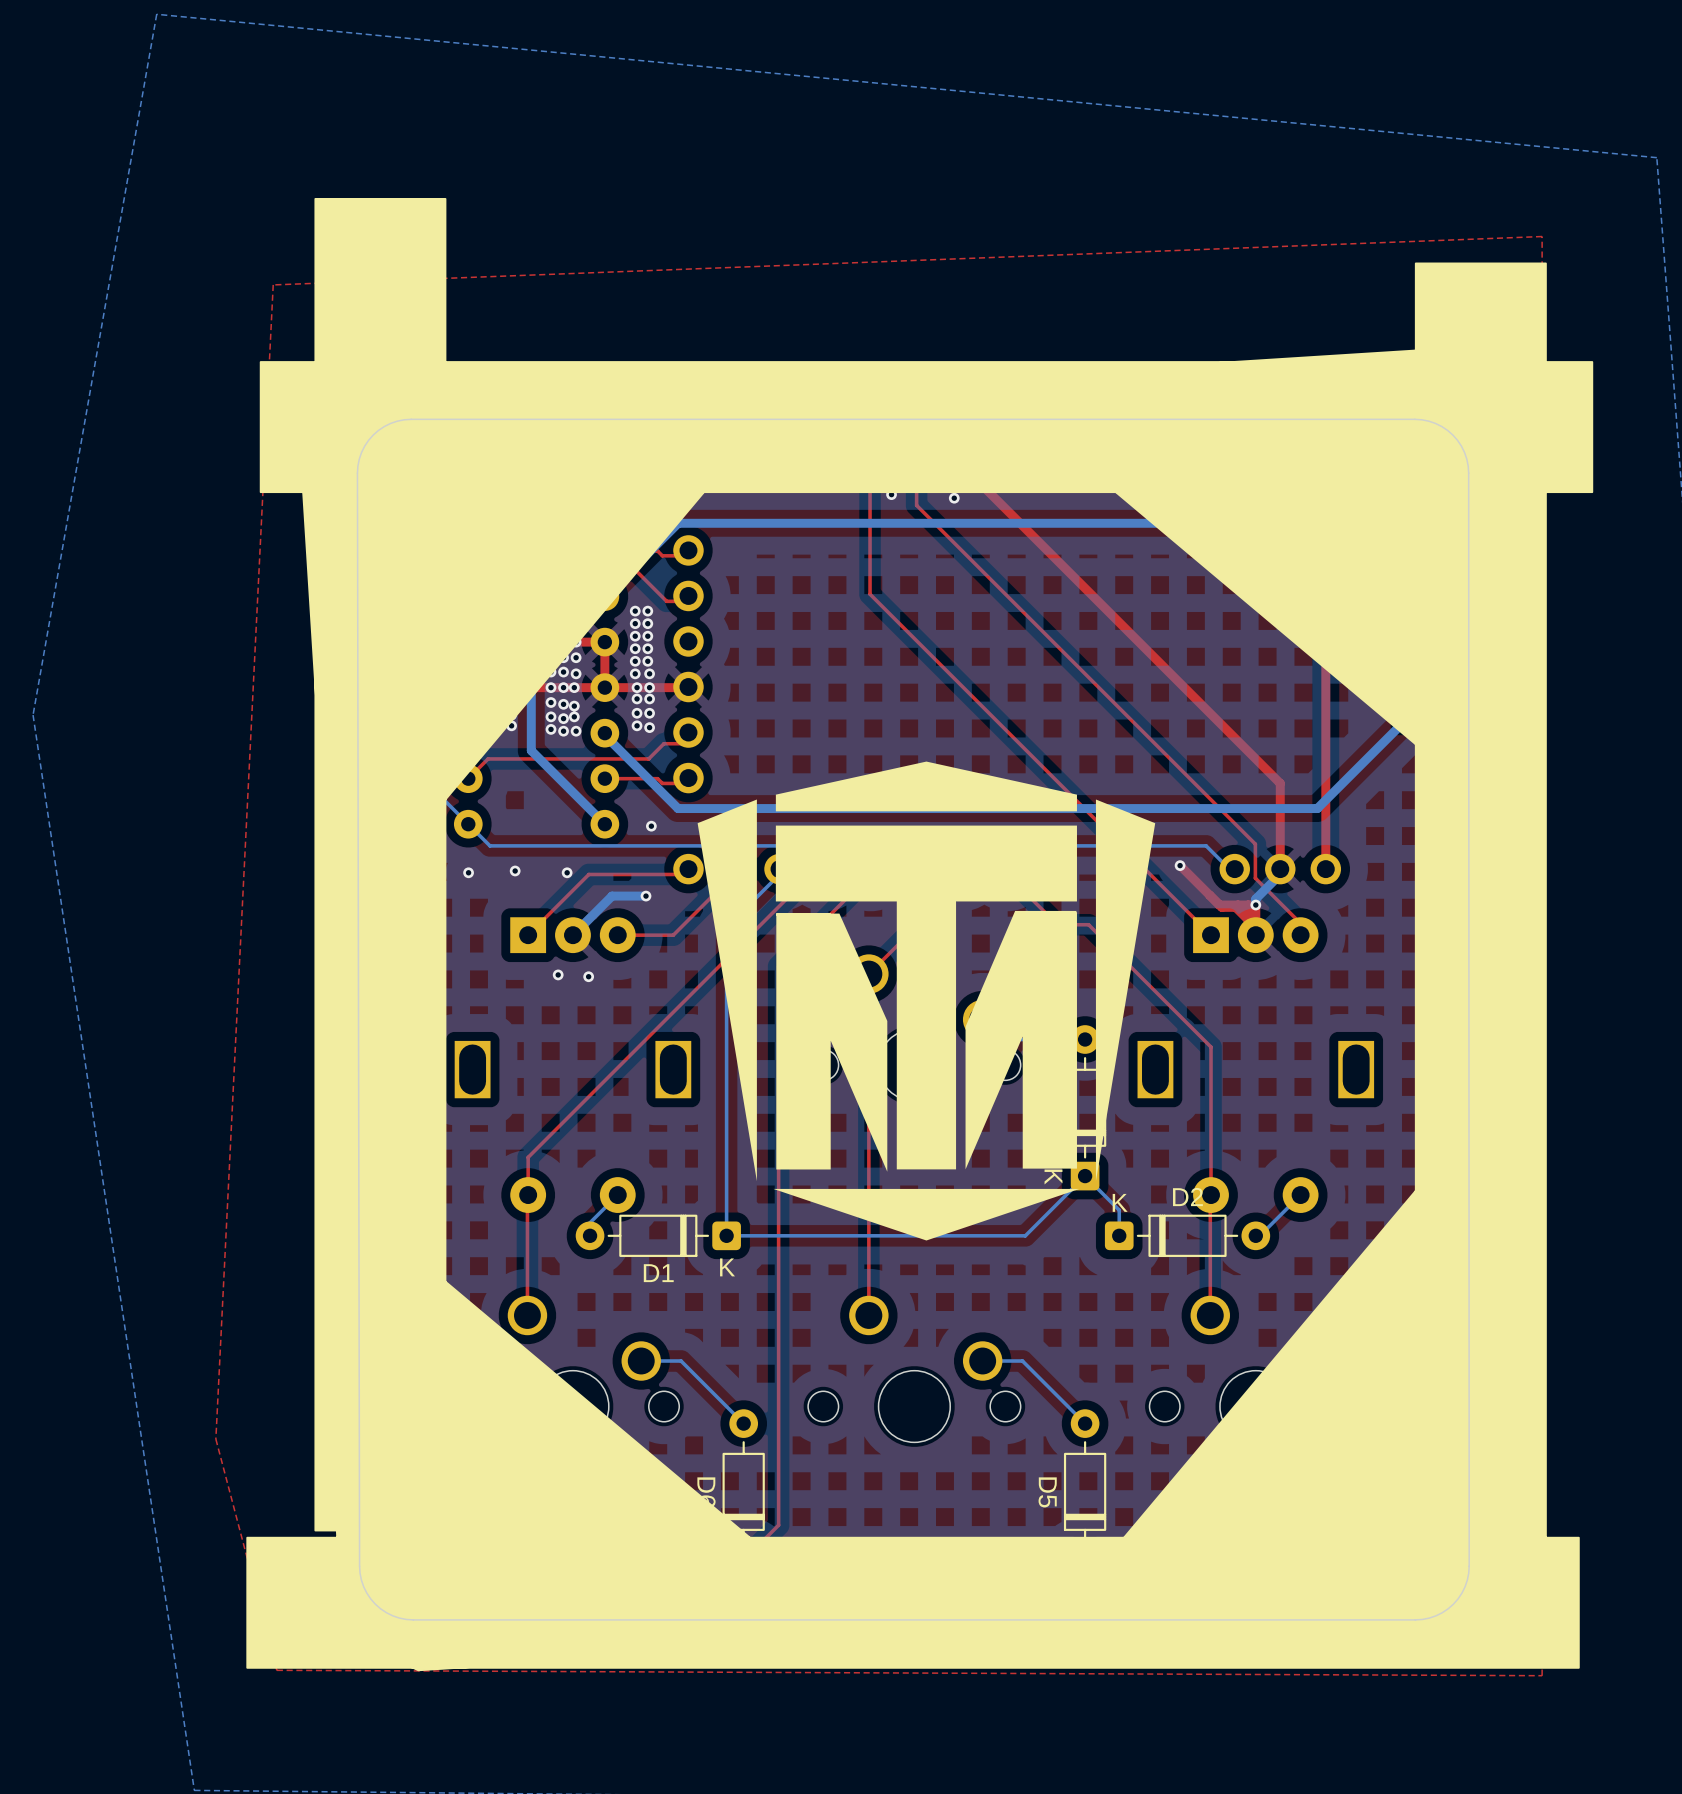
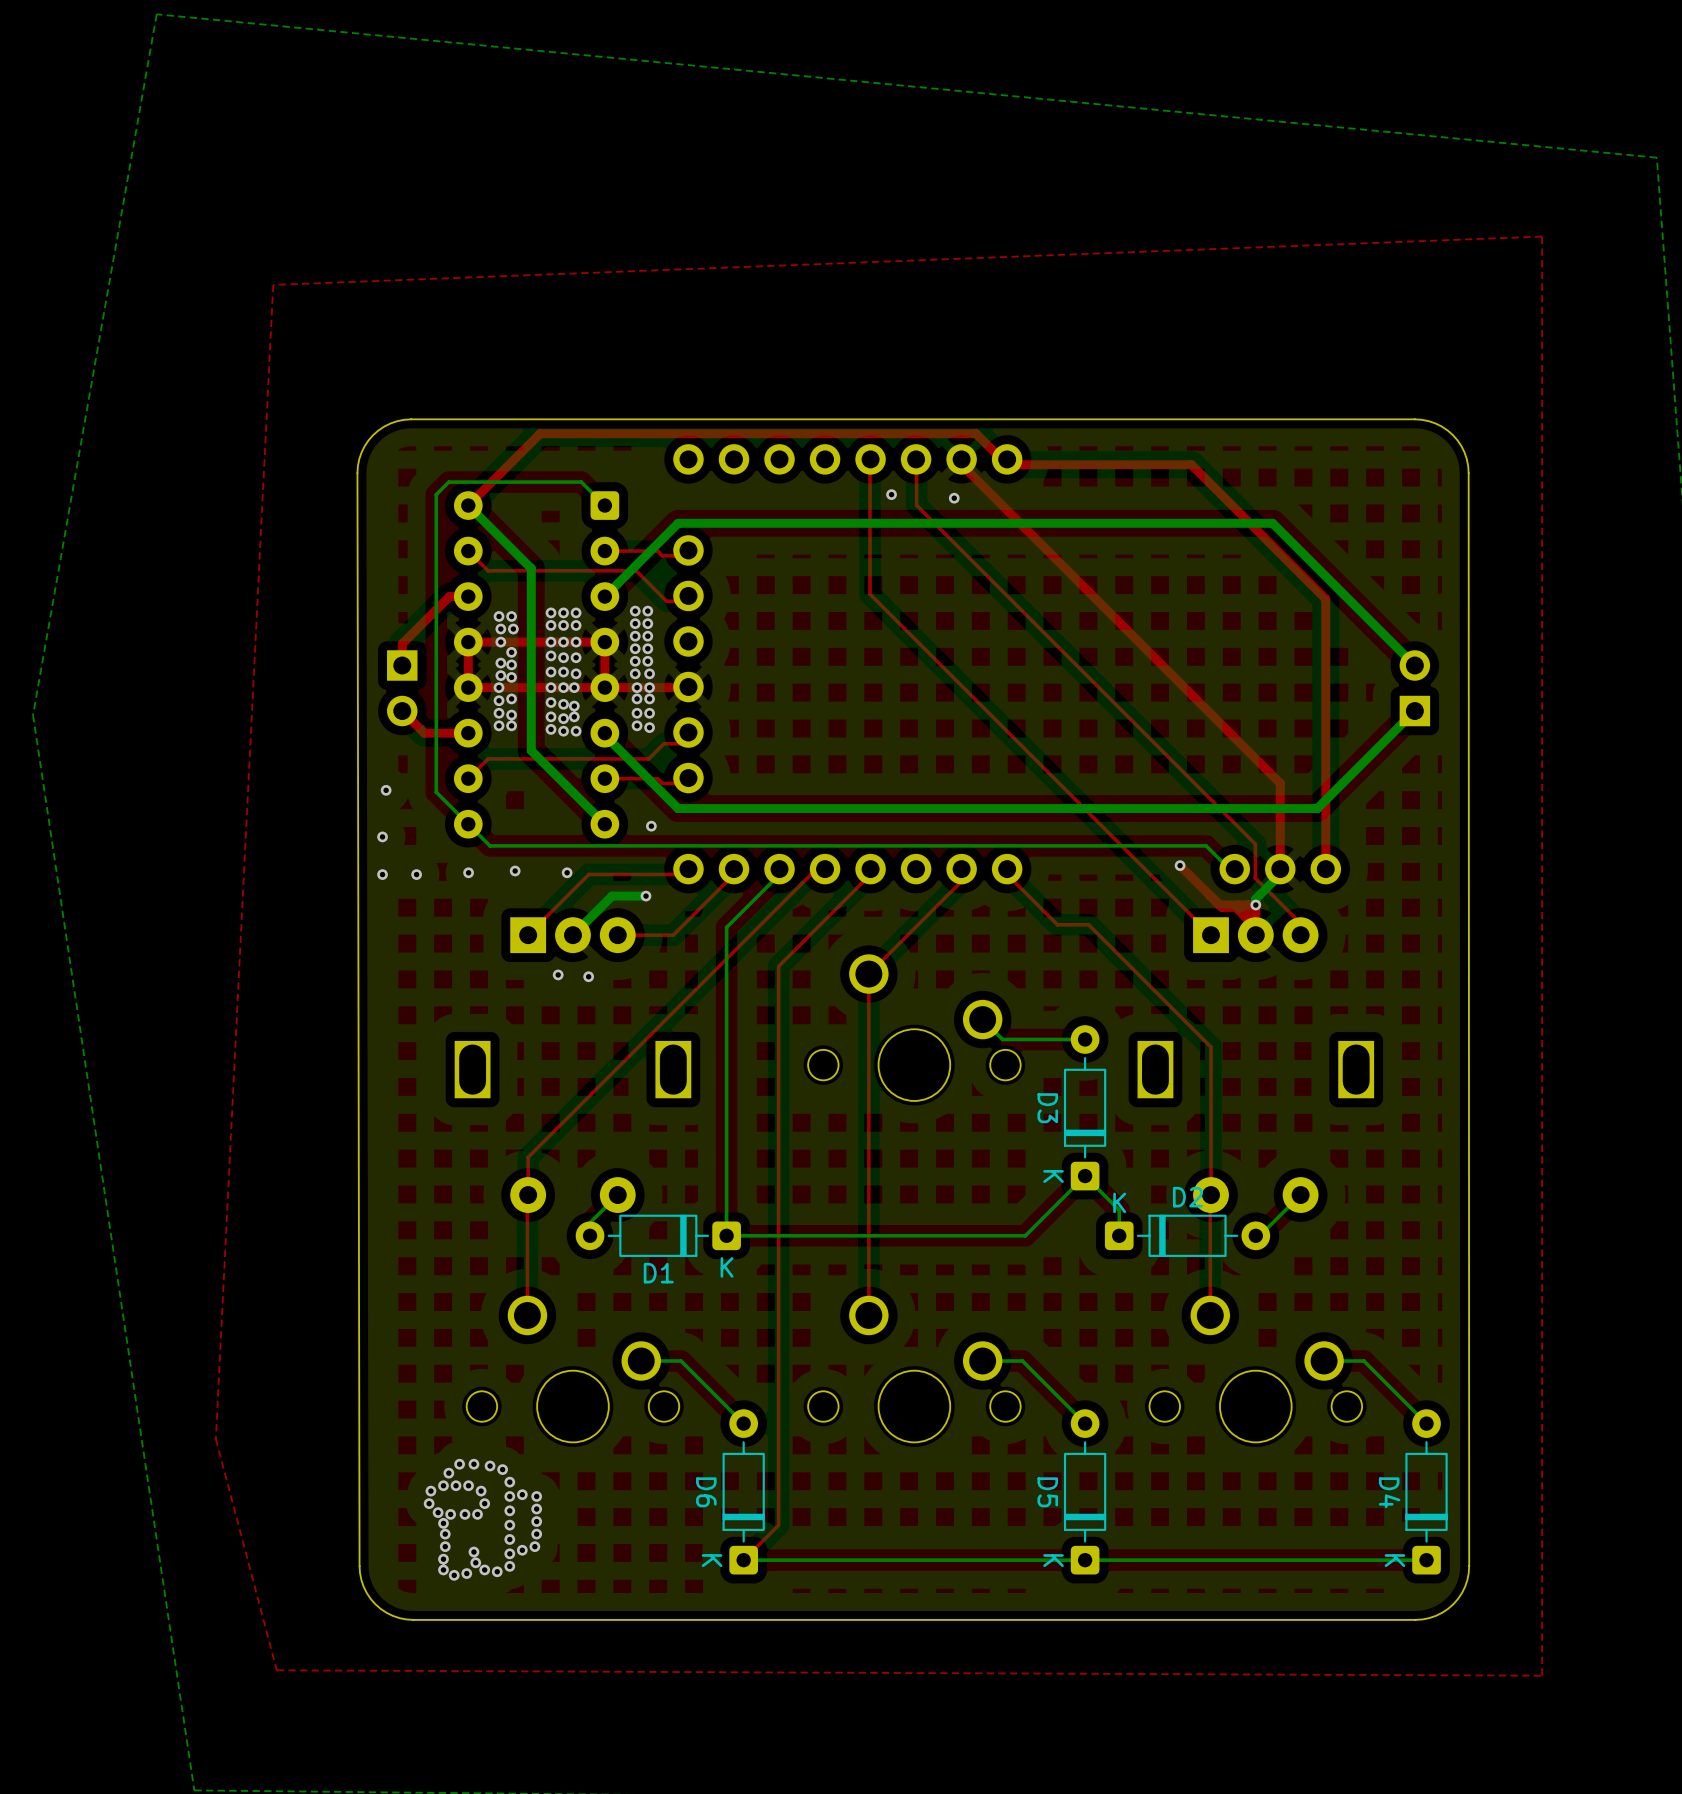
drawing: [246, 198, 1594, 1672] -> none

